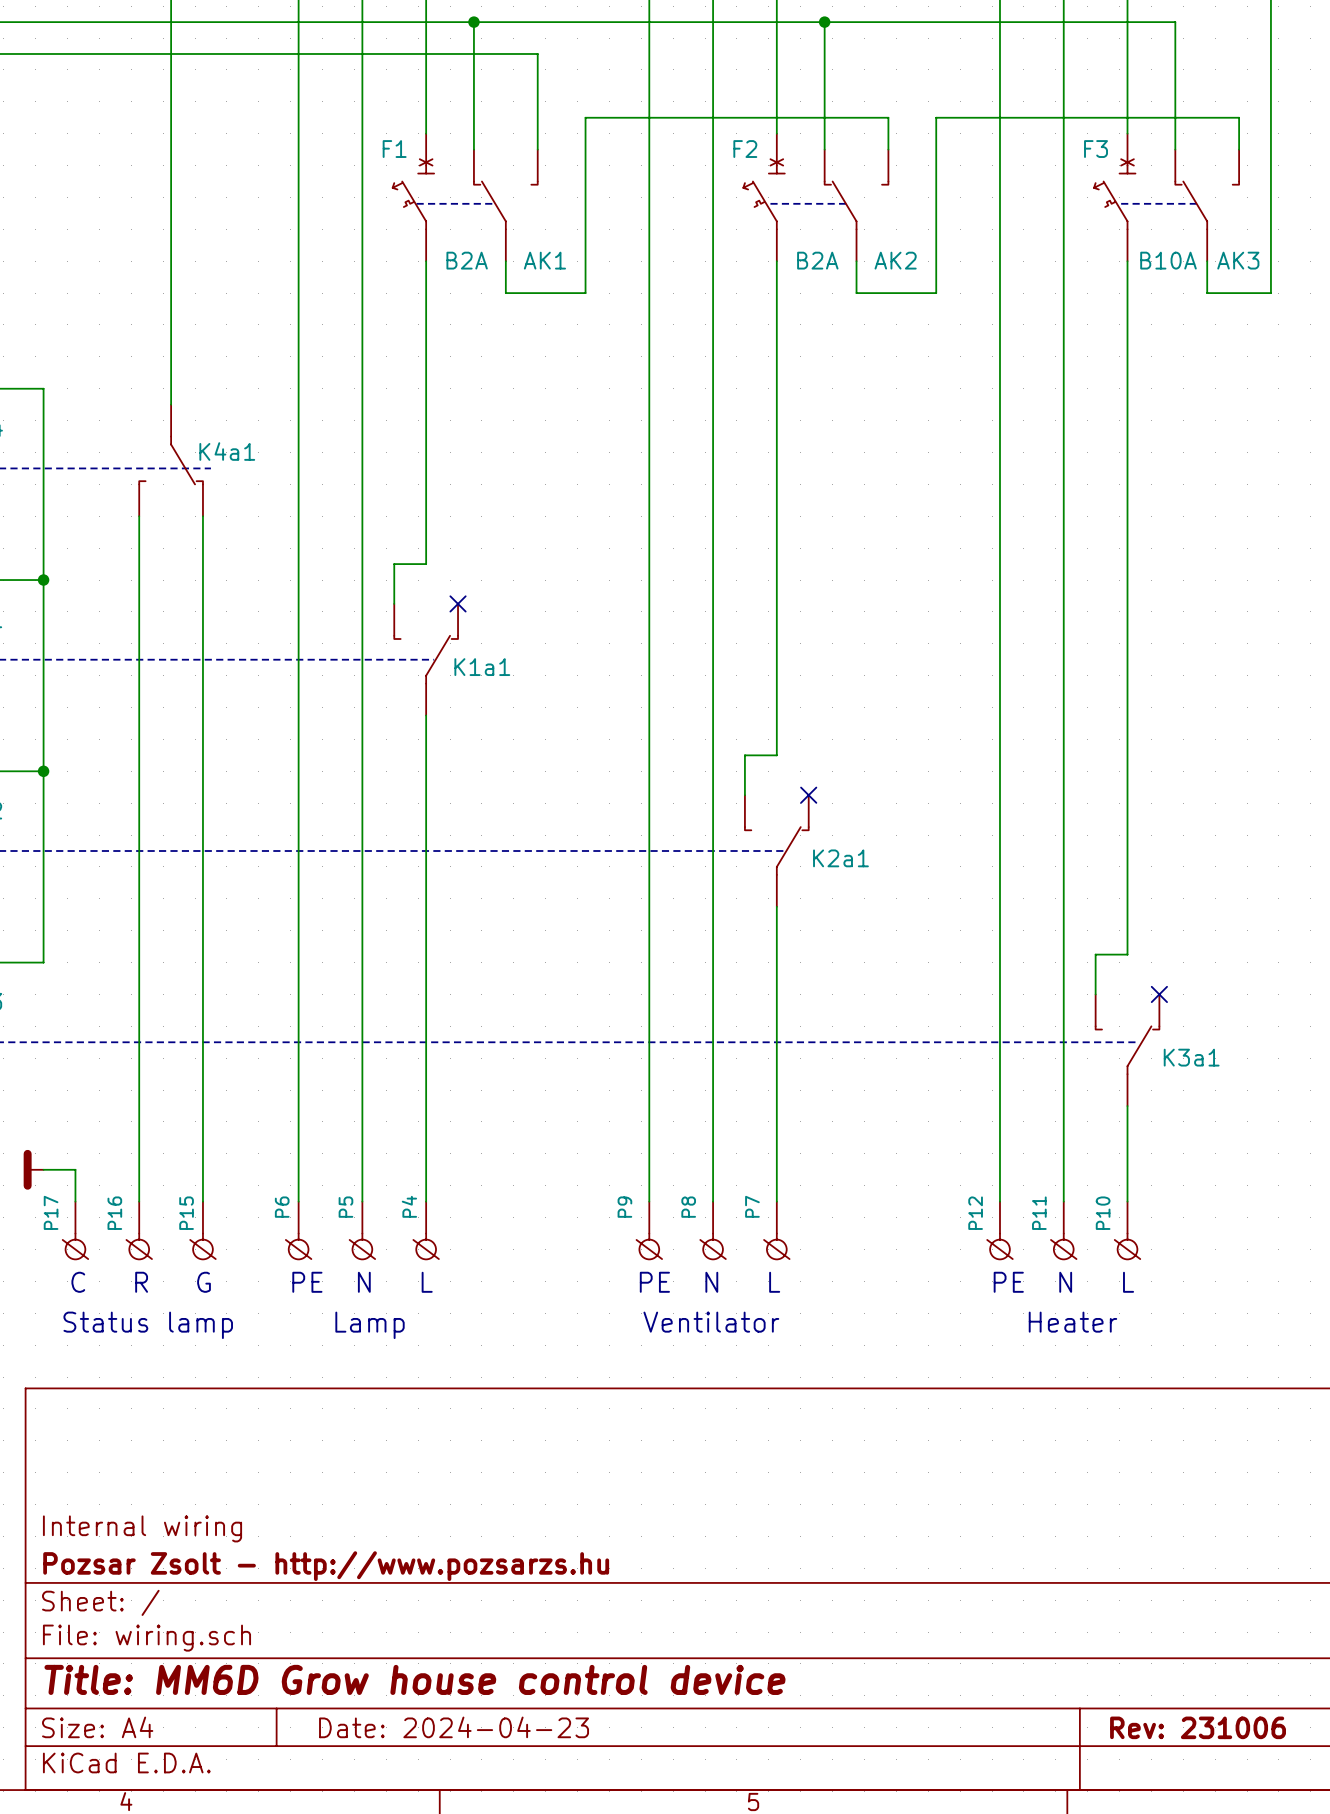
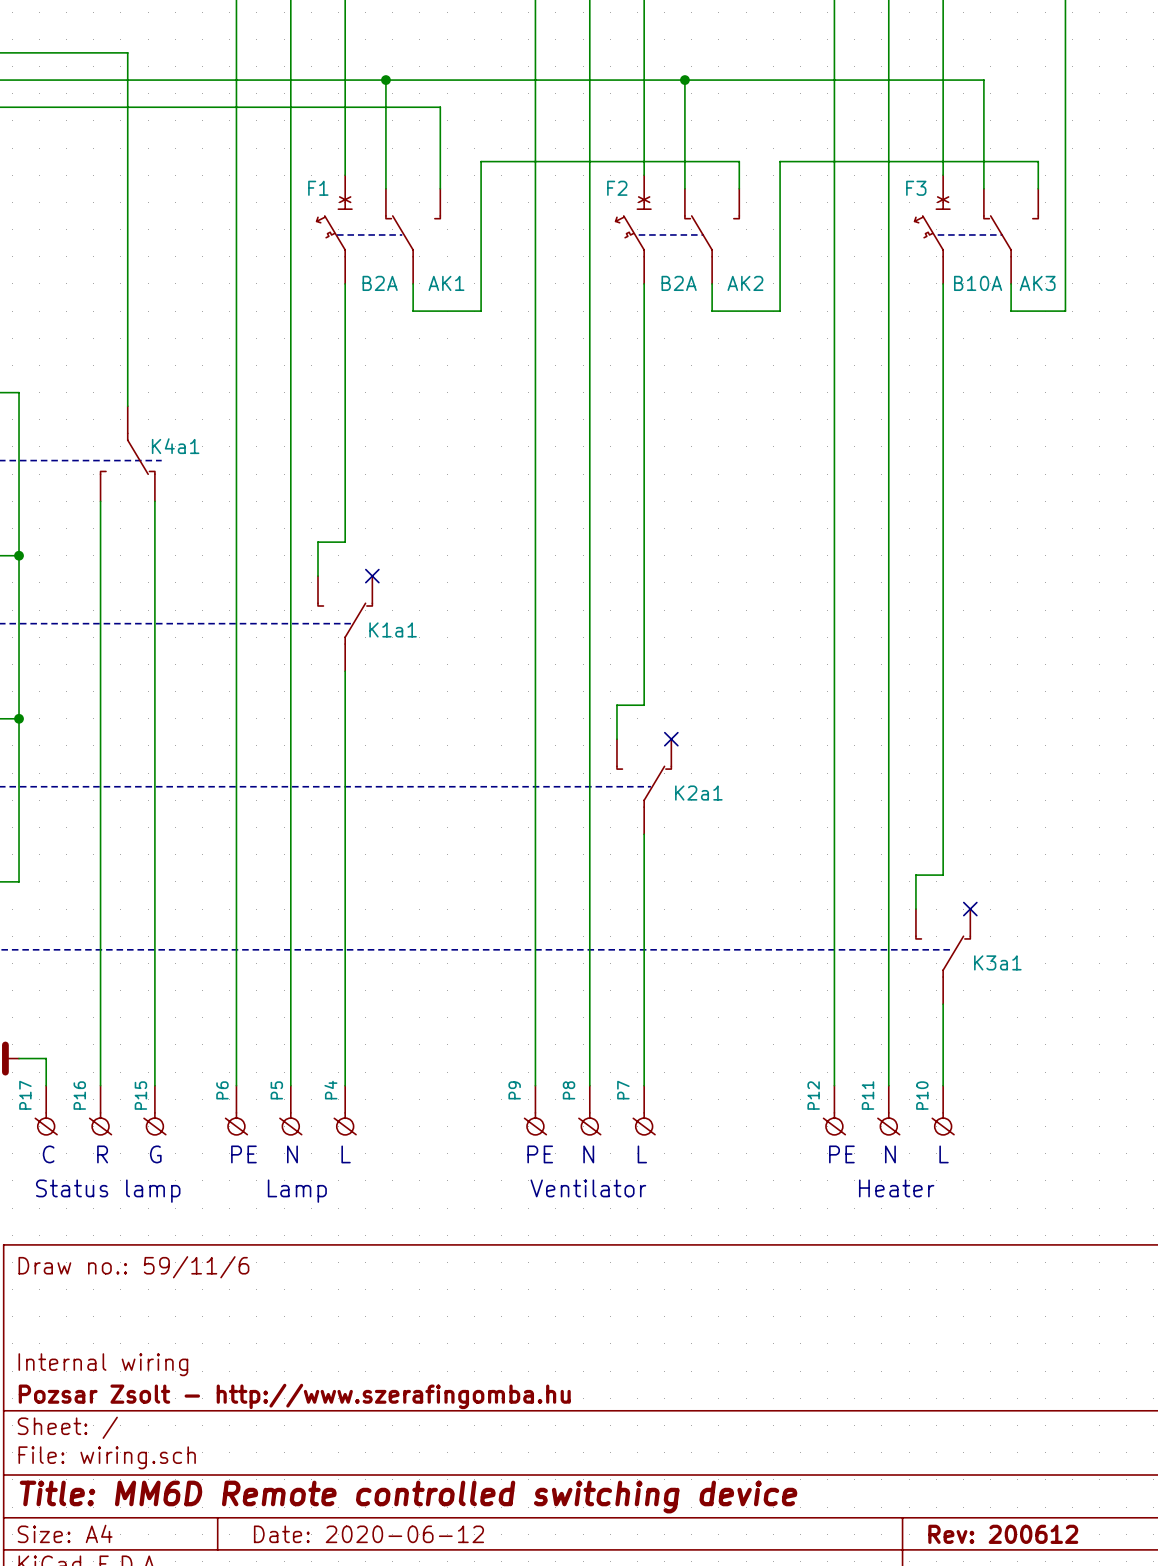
title block: none -> Draw no.: 59/11/6 (133, 1267)
title block: Pozsar Zsolt - http://www.pozsarzs.hu (326, 1566) -> Pozsar Zsolt - http://www.szerafingomba.hu (294, 1396)
title block: Title: MM6D Grow house control device (415, 1679) -> Title: MM6D Remote controlled switching device (408, 1497)
title block: Date: 2024-04-23 (454, 1727) -> Date: 2020-06-12 (368, 1534)
title block: Rev: 231006 (1198, 1727) -> Rev: 200612 (1003, 1534)

